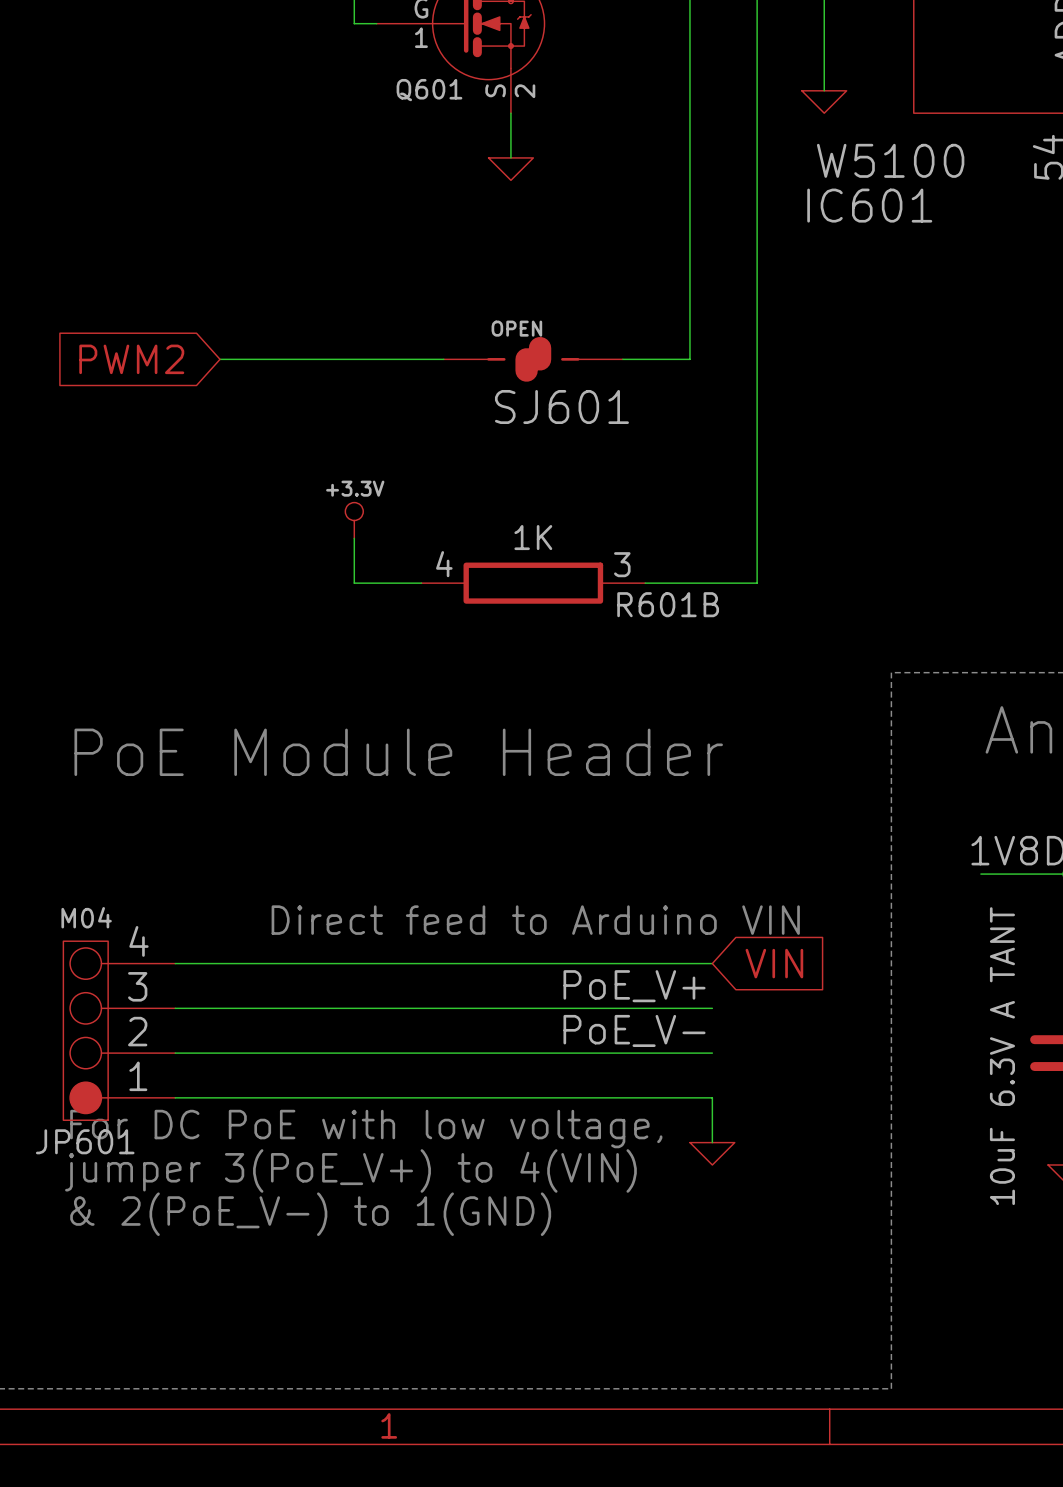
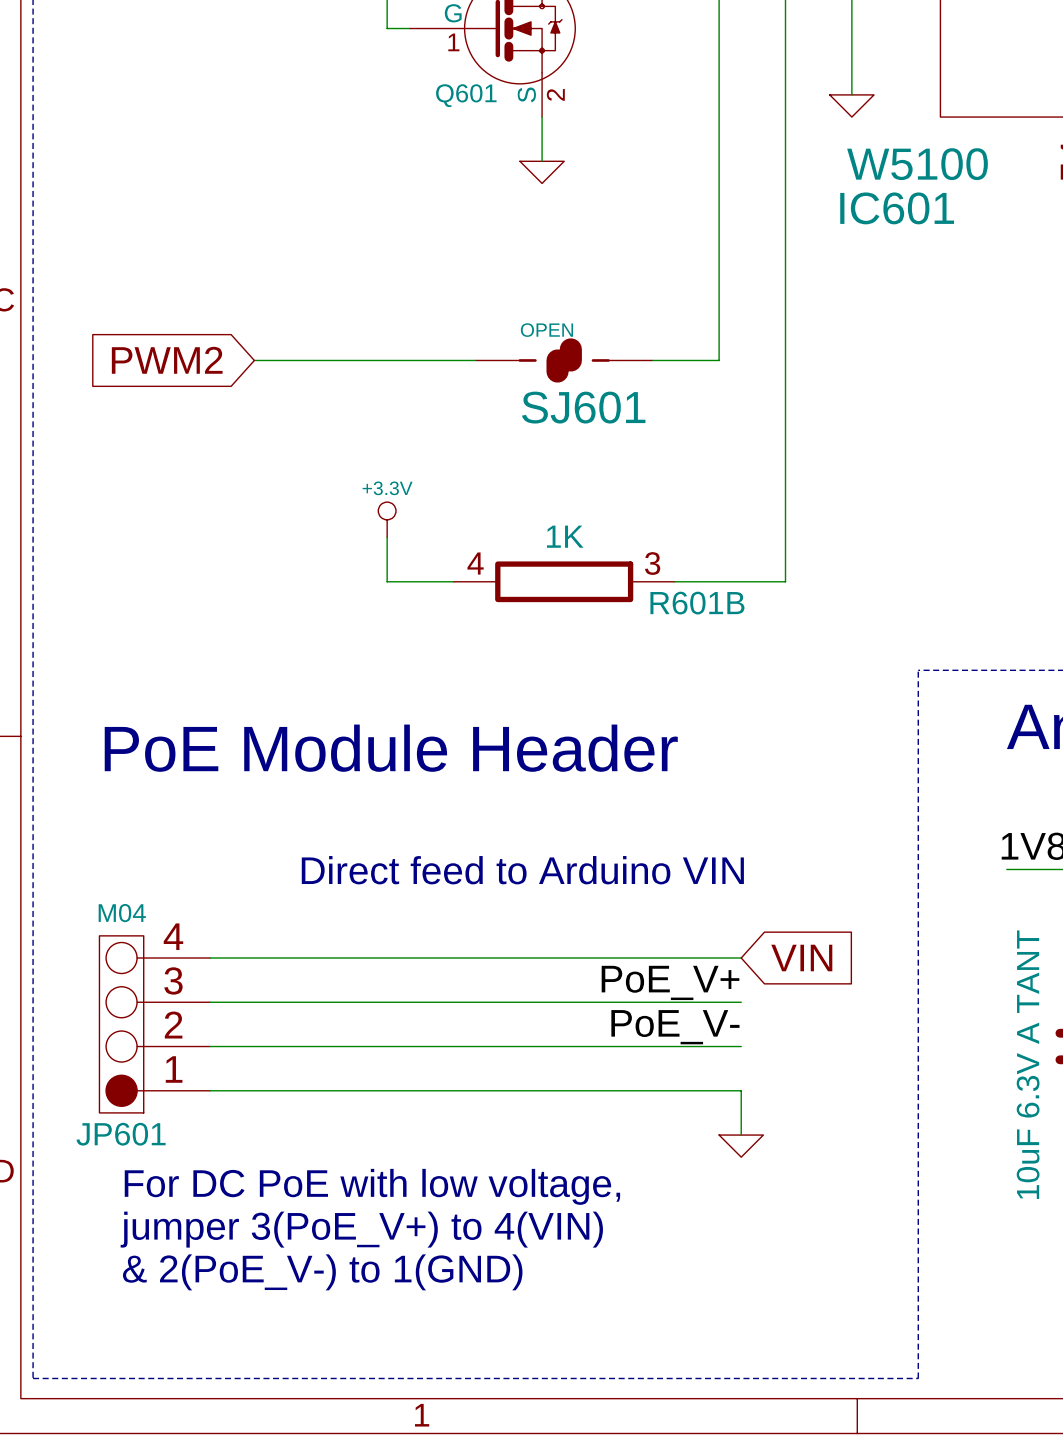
text position: Direct feed to Arduino VIN (535, 920) -> Direct feed to Arduino VIN (522, 870)
text position: For DC PoE with low voltage, (366, 1129) -> For DC PoE with low voltage, (372, 1186)
text position: jumper 3(PoE_V+) to 4(VIN) (350, 1170) -> jumper 3(PoE_V+) to 4(VIN) (361, 1229)
text position: & 2(PoE_V-) to 1(GND) (310, 1214) -> & 2(PoE_V-) to 1(GND) (322, 1272)

